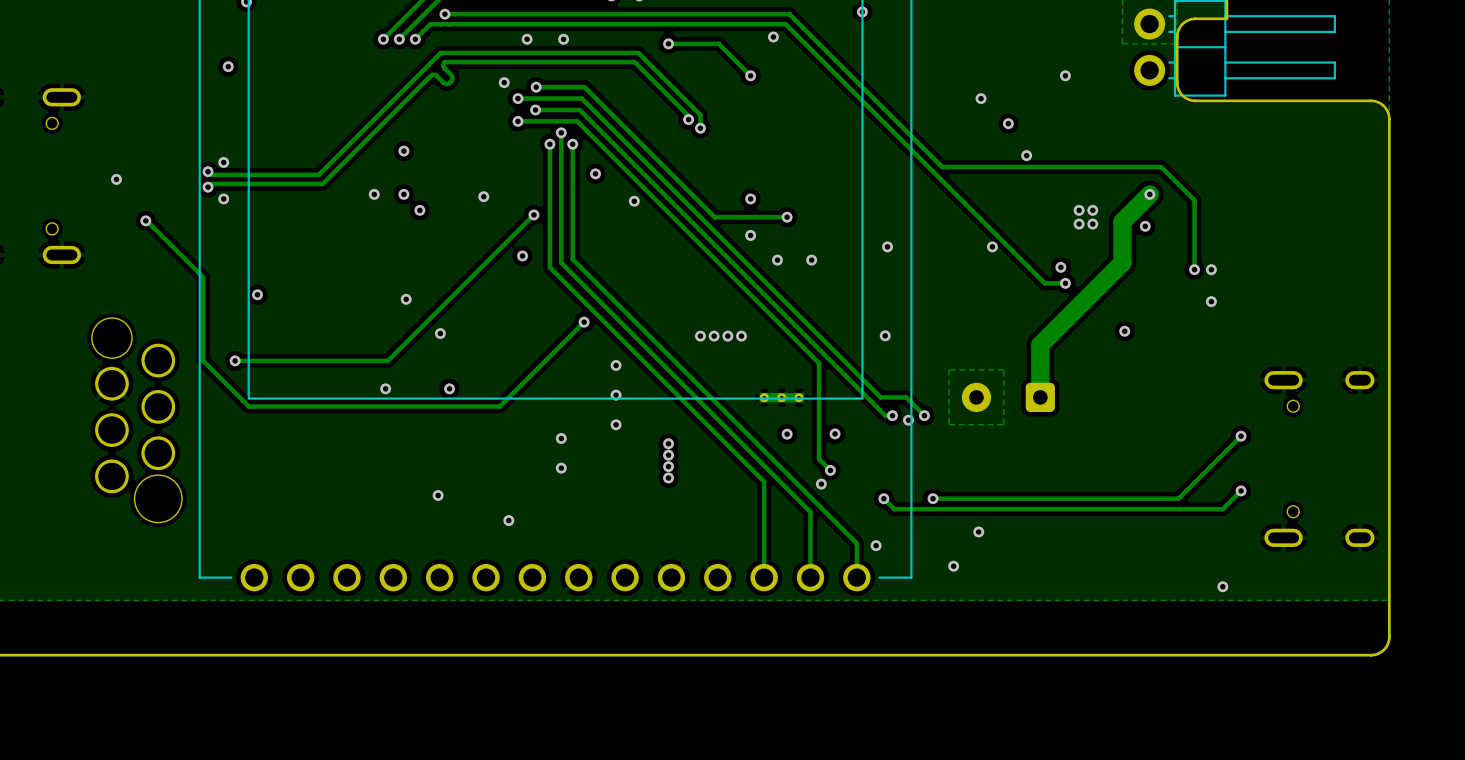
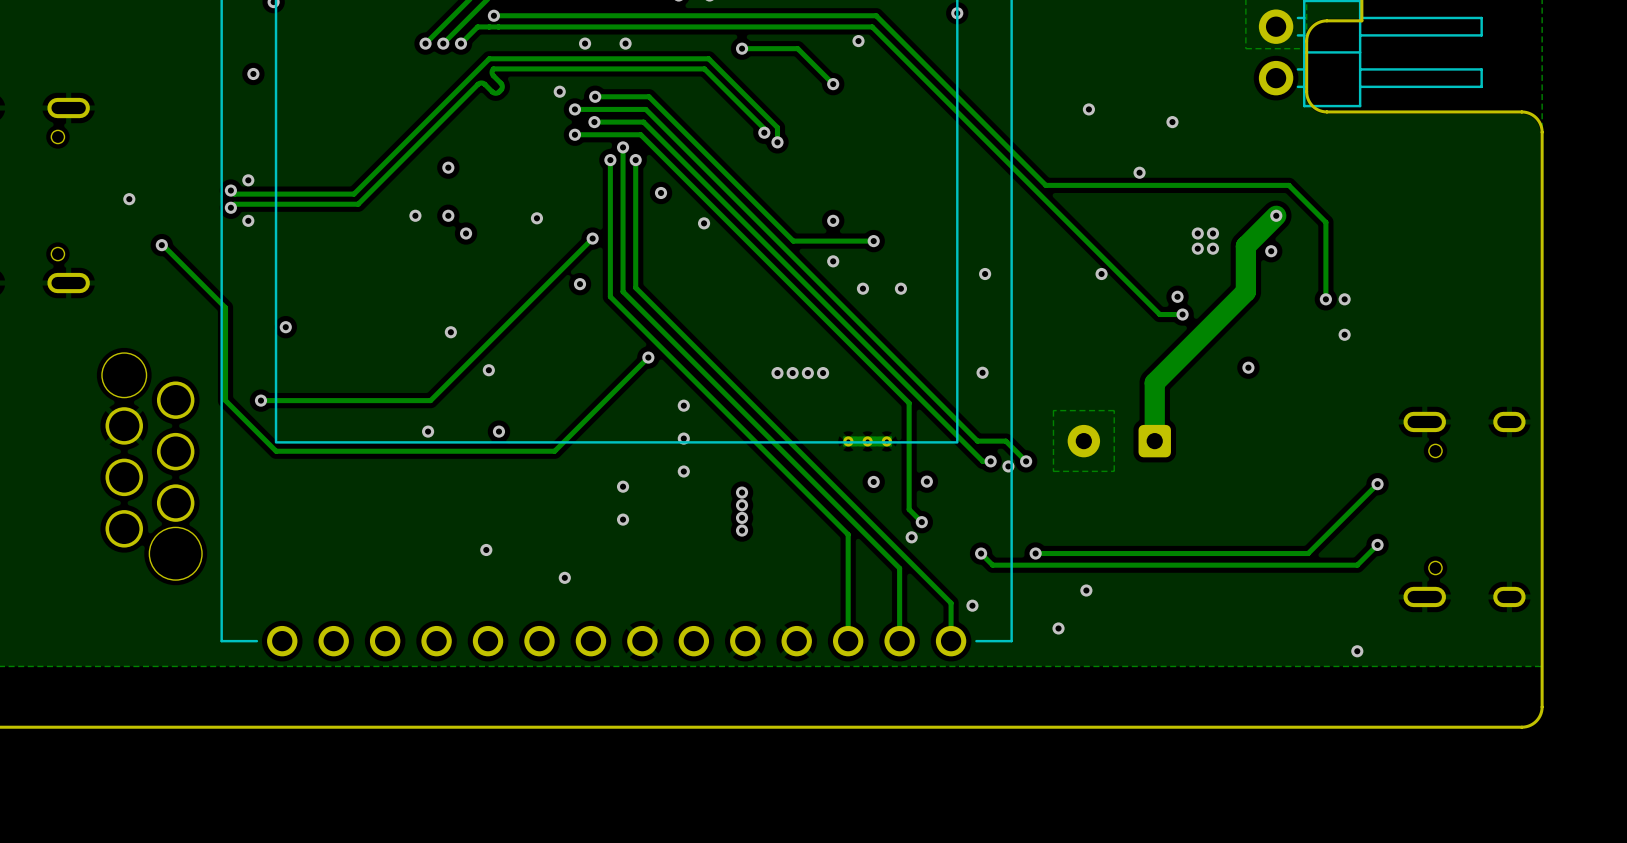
via: (1065, 75) -> none
via: none -> (1172, 122)
via: (1008, 123) -> none

